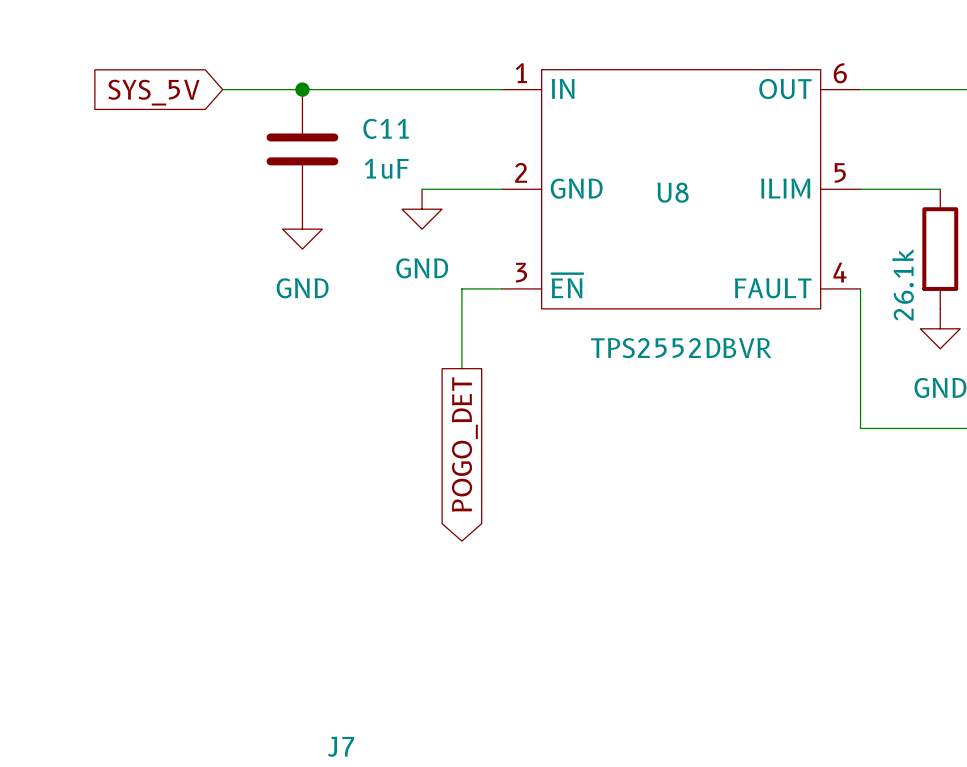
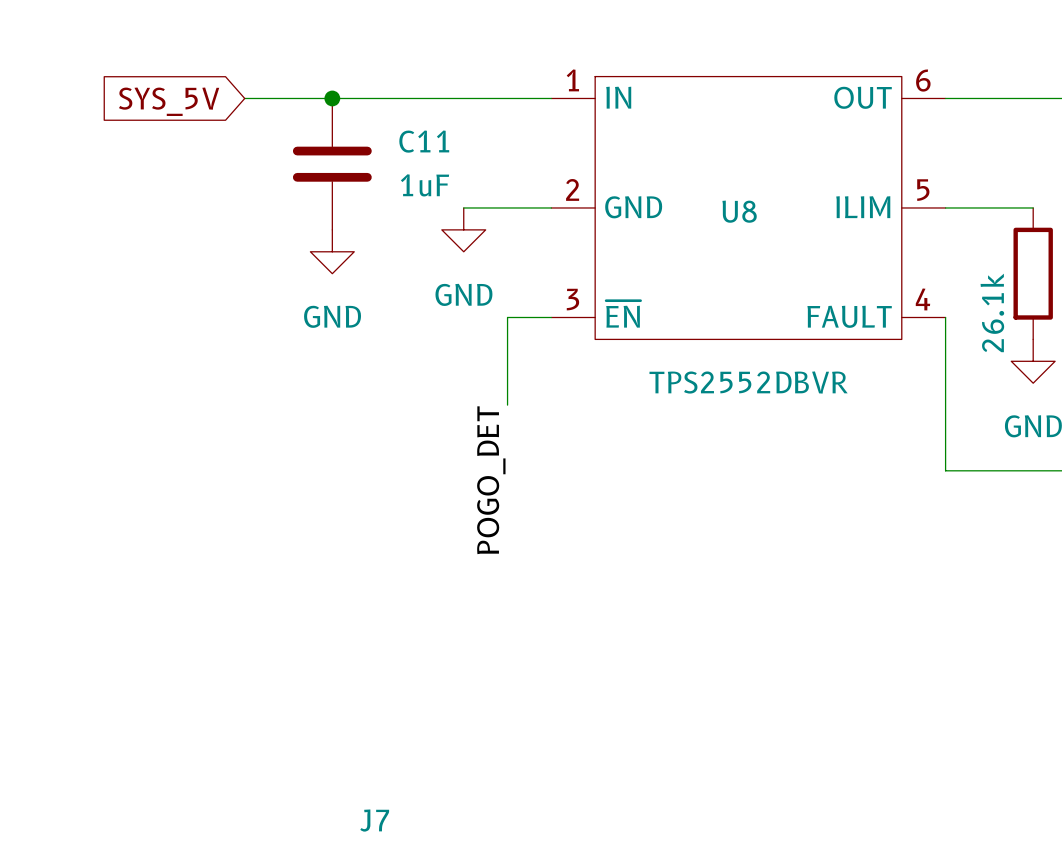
label: none -> POGO_DET (491, 480)
global label: POGO_DET (464, 444) -> none

